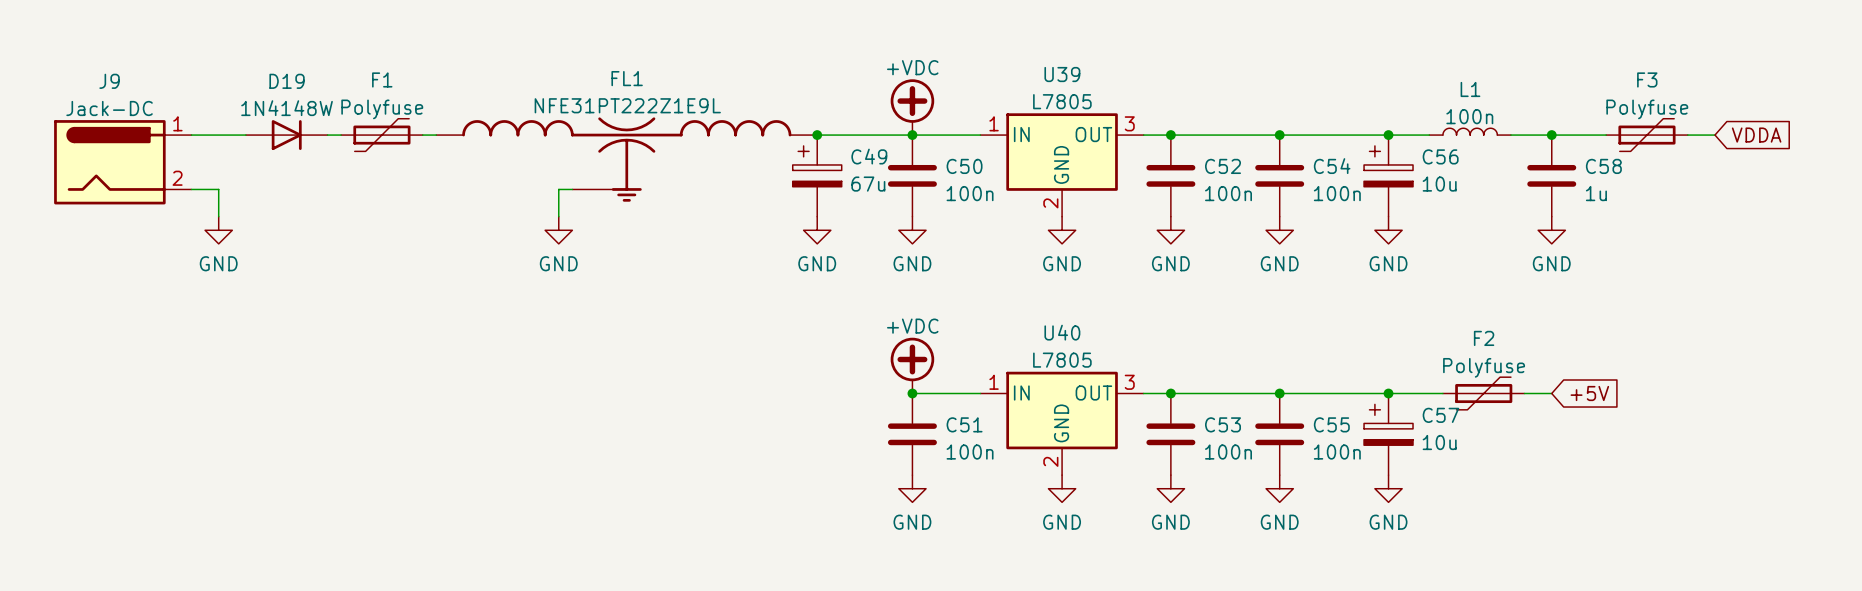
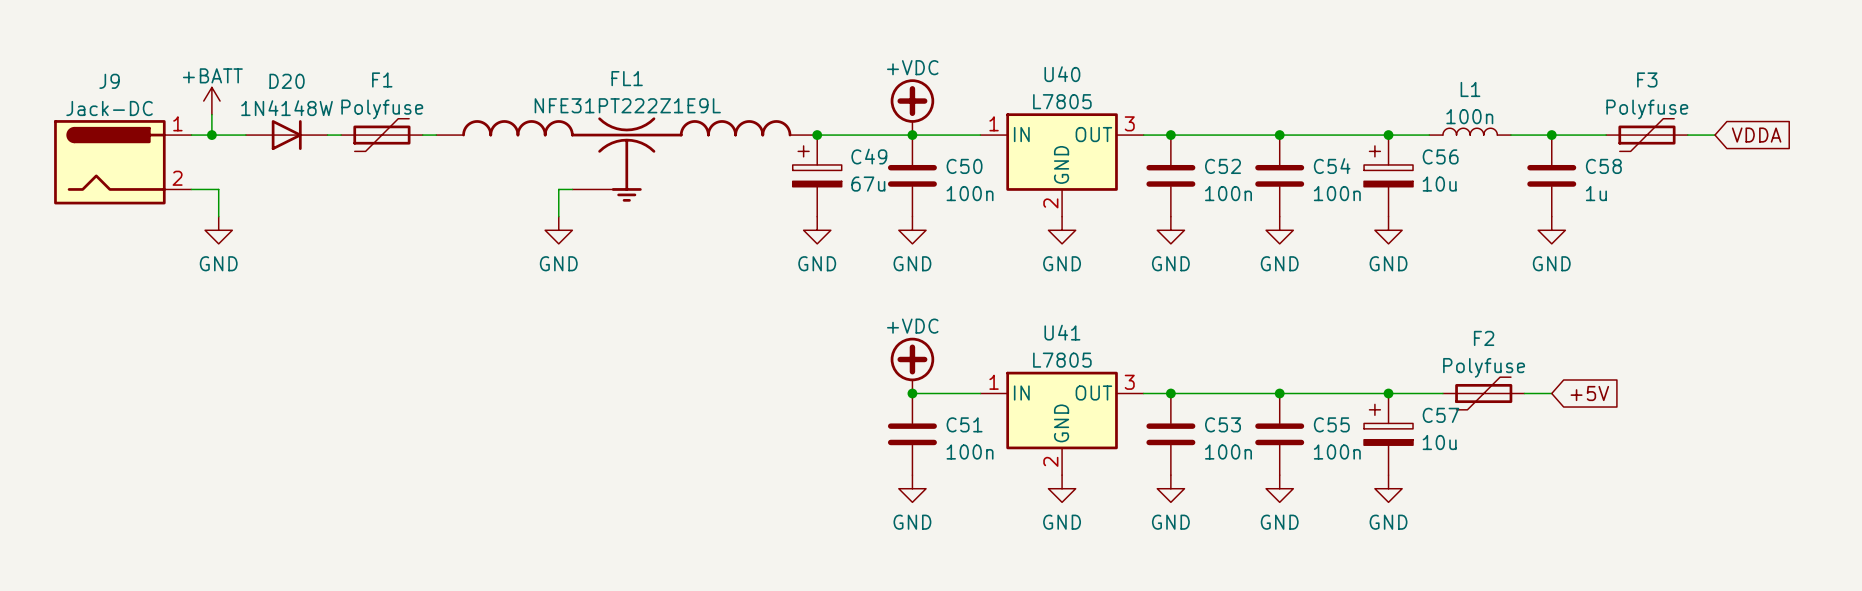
U39 name: U39 (1062, 74) -> U40 (1062, 74)
D19 name: D19 (287, 81) -> D20 (287, 81)
power symbol: none -> +BATT (211, 101)
wire: none -> (211, 114) (211, 135)
junction: none -> (211, 135)
U40 name: U40 (1062, 332) -> U41 (1062, 332)

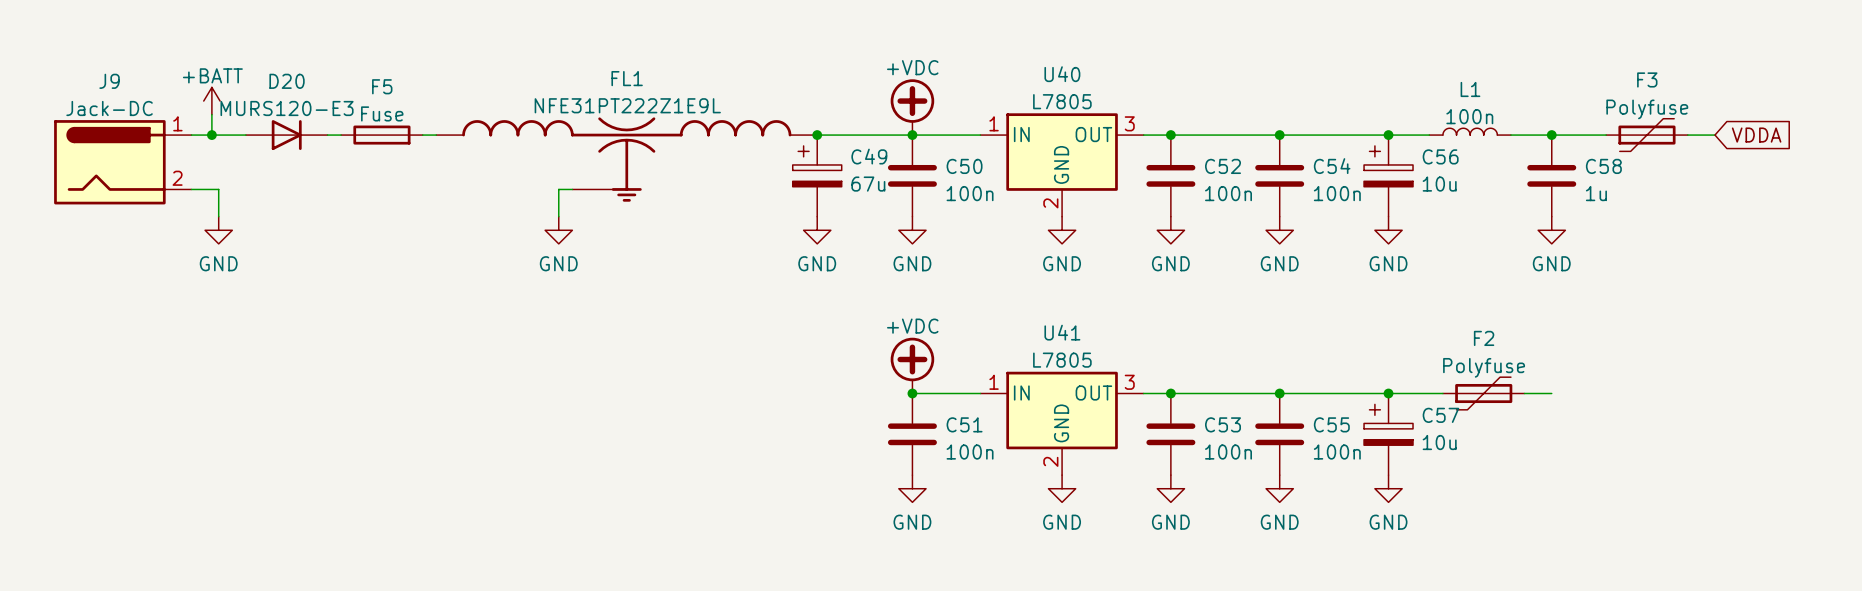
D20 value: 1N4148W (287, 108) -> MURS120-E3 (287, 108)
F1: Polyfuse (381, 135) -> none
F5: none -> Fuse (381, 135)
global label: +5V (1589, 393) -> none

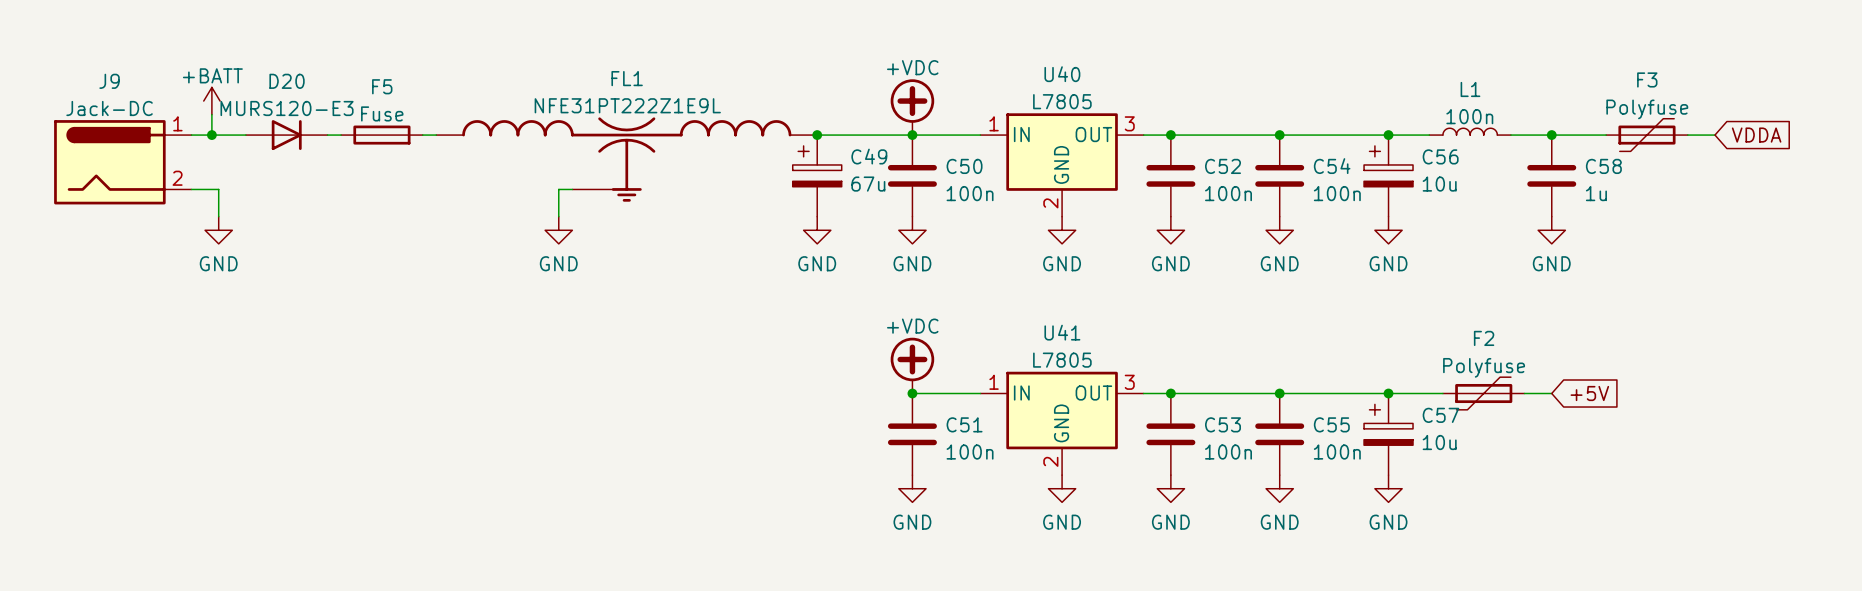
global label: none -> +5V (1589, 393)

